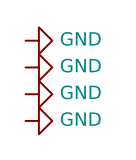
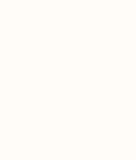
power symbol: GND (38, 40) -> none
power symbol: GND (38, 67) -> none
power symbol: GND (38, 94) -> none
power symbol: GND (38, 120) -> none

